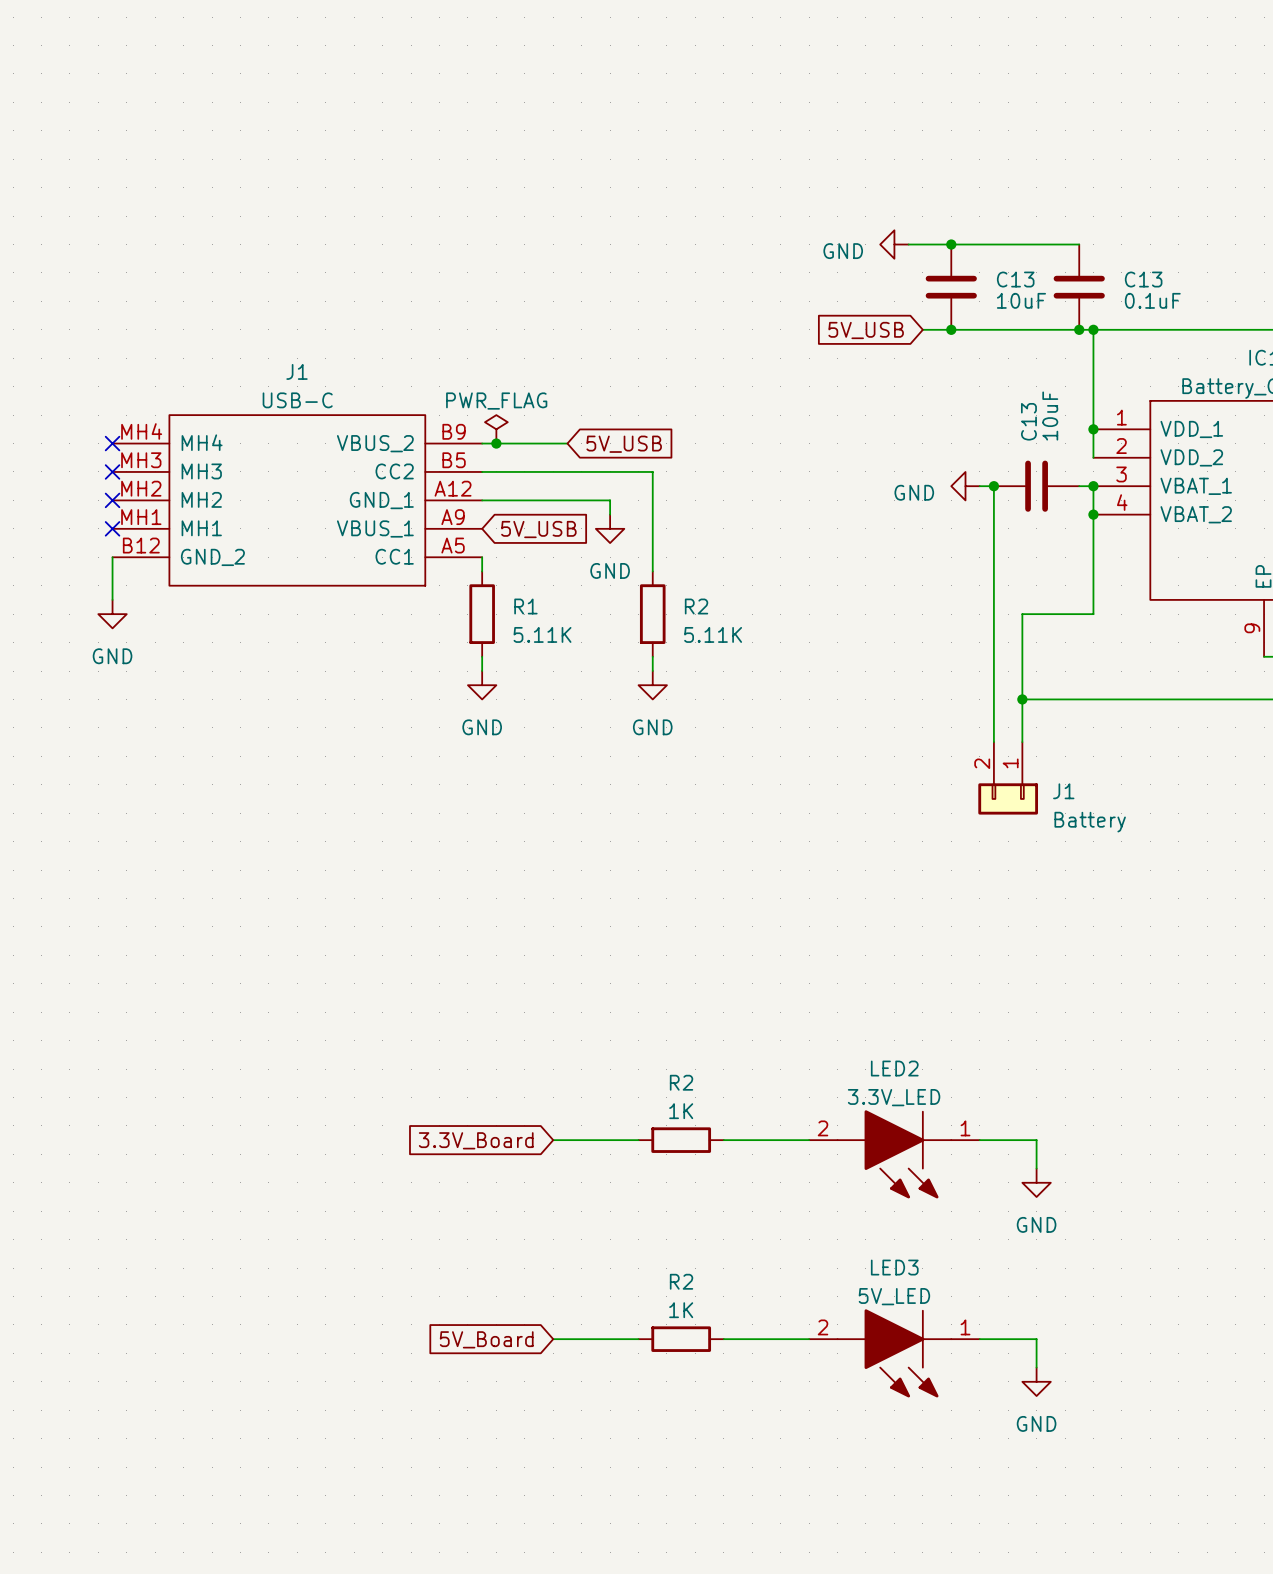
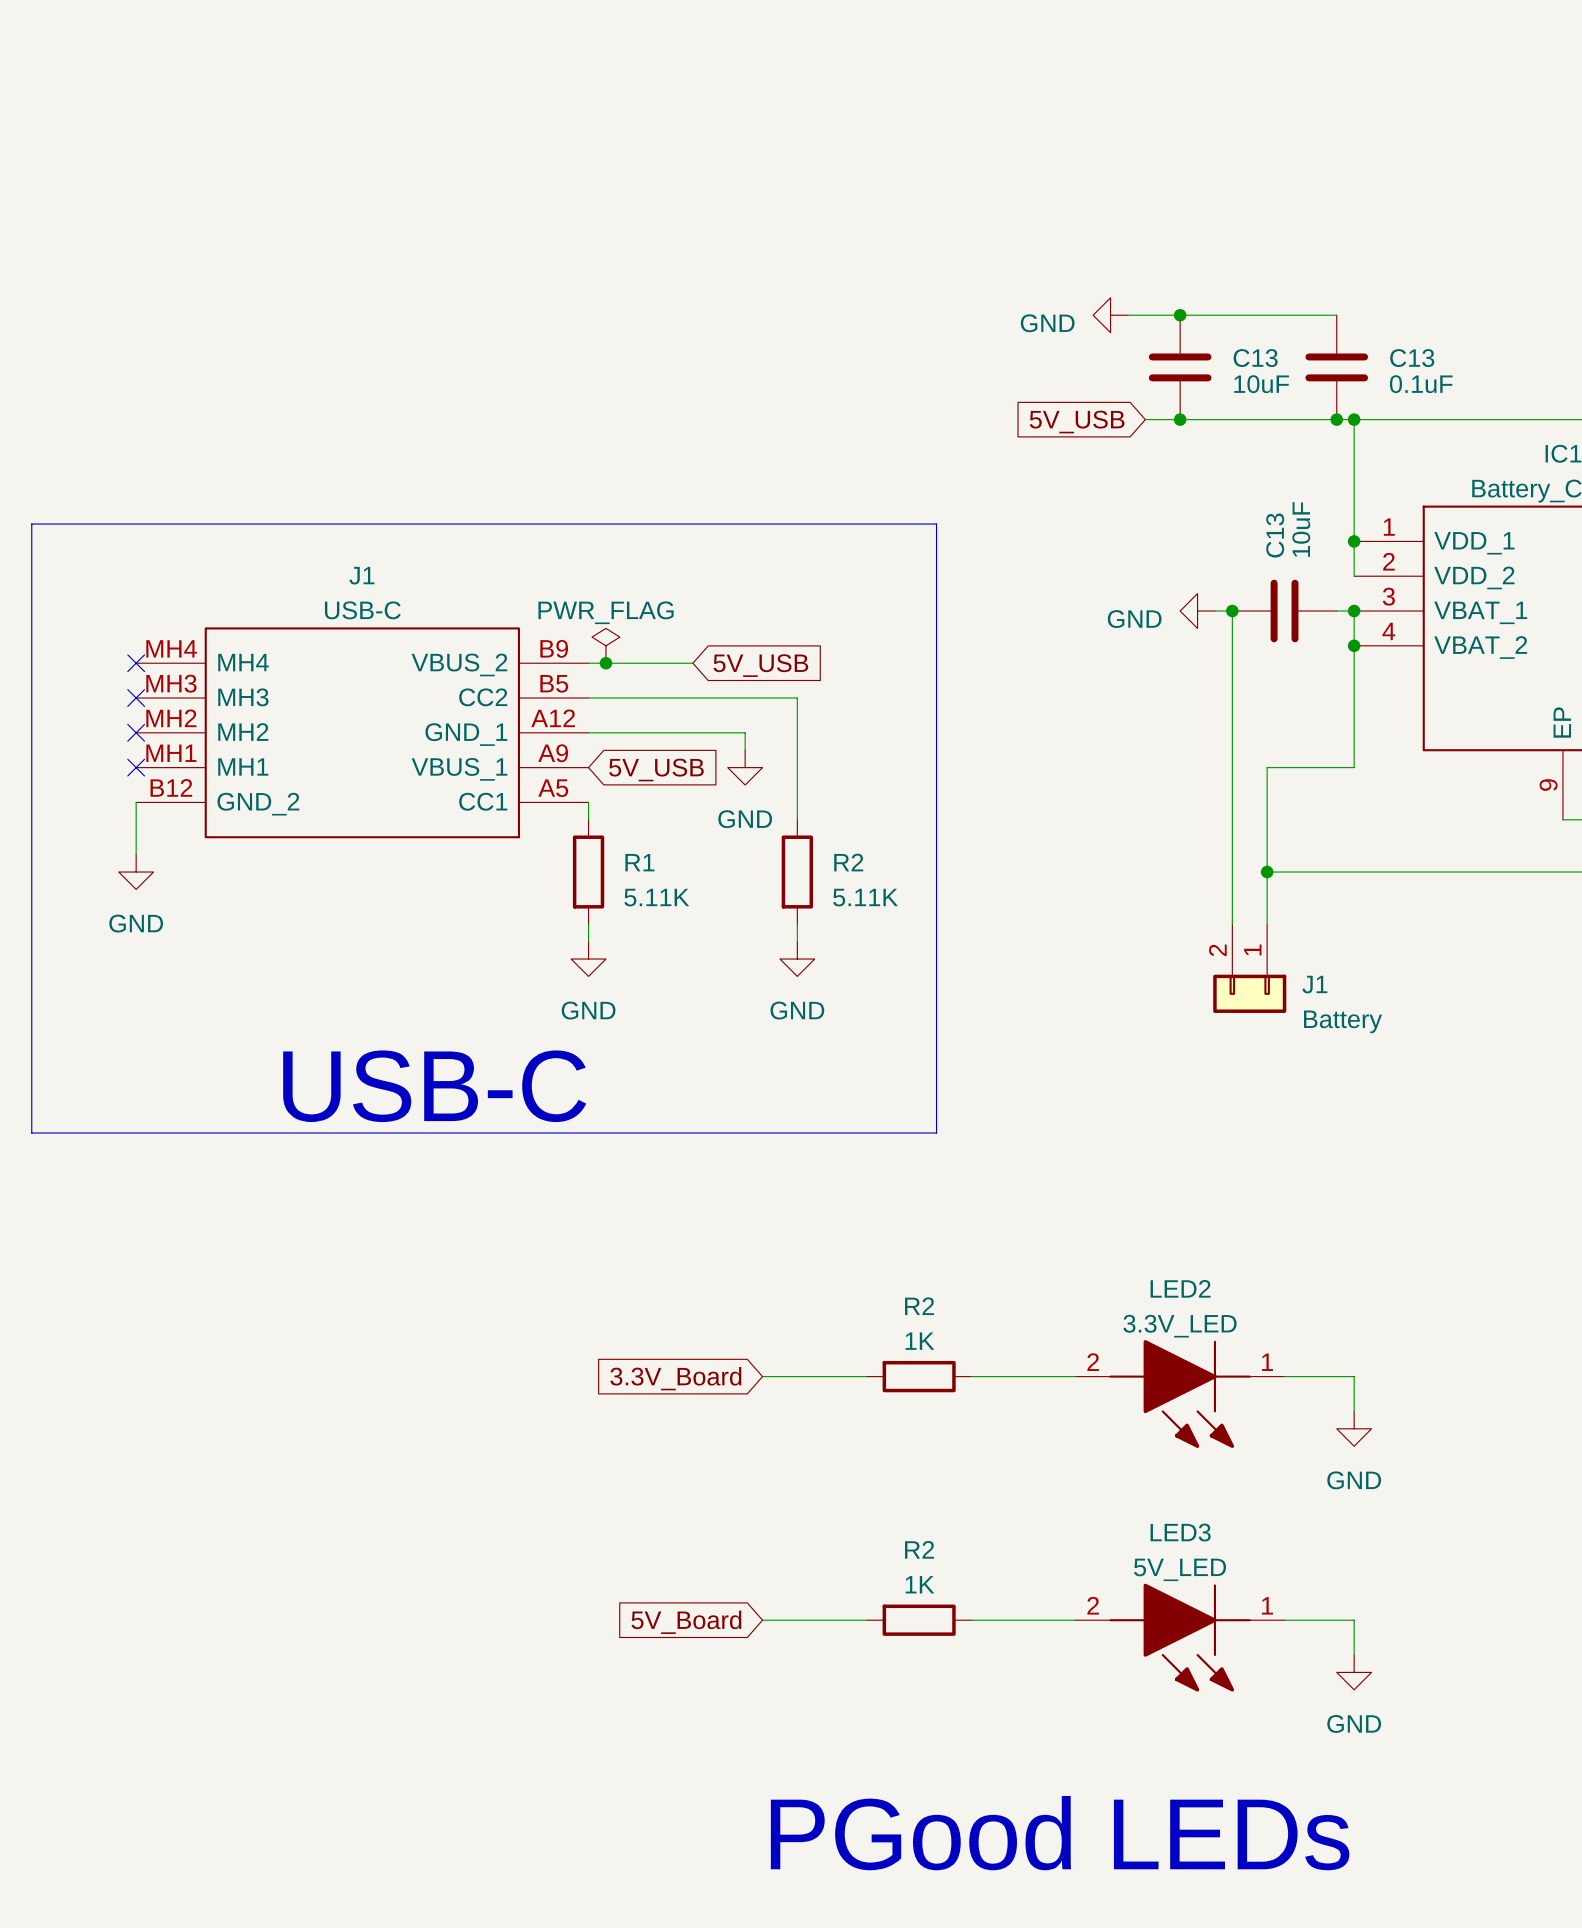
line: none -> (31, 524) (936, 524) (936, 1133) (31, 1133) (31, 524)
power symbol position: PWR_FLAG (496, 429) -> PWR_FLAG (605, 645)
no-connect mark: (112, 443) -> none
wire: (482, 443) (567, 443) -> (588, 663) (692, 663)
junction: (496, 443) -> none
global label: 5V_USB (624, 444) -> none
no-connect mark: (112, 471) -> none
wire: (482, 471) (652, 471) (652, 571) -> (588, 698) (797, 698) (797, 819)
no-connect mark: (112, 500) -> none
J1 position: (297, 500) -> (362, 732)
wire: (482, 500) (610, 500) (610, 514) -> (588, 732) (745, 732) (745, 750)
no-connect mark position: (112, 528) -> (136, 663)
junction: none -> (605, 663)
power symbol: GND (610, 528) -> none
global label position: 5V_USB (538, 529) -> 5V_USB (760, 665)
no-connect mark: none -> (136, 698)
wire: (112, 557) (112, 599) -> (136, 802) (136, 854)
wire: (482, 557) (482, 571) -> (588, 802) (588, 819)
no-connect mark: none -> (136, 732)
no-connect mark: none -> (136, 767)
power symbol position: GND (112, 614) -> GND (136, 872)
R1 position: (482, 614) -> (588, 872)
global label: none -> 5V_USB (656, 770)
power symbol: none -> GND (745, 767)
R2 position: (652, 614) -> (797, 872)
wire: (482, 656) (482, 671) -> (588, 924) (588, 941)
wire: (652, 656) (652, 671) -> (797, 924) (797, 941)
power symbol: GND (482, 685) -> none
power symbol: GND (652, 685) -> none
power symbol: none -> GND (588, 959)
power symbol: none -> GND (797, 959)
text: none -> USB-C (434, 1086)
global label position: 3.3V_Board (476, 1140) -> 3.3V_Board (675, 1378)
wire: (553, 1140) (638, 1140) -> (762, 1376) (866, 1376)
R2 position: (681, 1140) -> (919, 1376)
wire: (723, 1140) (809, 1140) -> (971, 1376) (1075, 1376)
wire: (979, 1140) (1036, 1140) (1036, 1168) -> (1284, 1376) (1354, 1376) (1354, 1411)
LED2 position: (894, 1154) -> (1180, 1394)
power symbol position: GND (1036, 1182) -> GND (1354, 1428)
global label position: 5V_Board (486, 1339) -> 5V_Board (686, 1622)
wire: (553, 1339) (638, 1339) -> (762, 1620) (866, 1620)
R2 position: (681, 1339) -> (919, 1620)
wire: (723, 1339) (809, 1339) -> (971, 1620) (1075, 1620)
wire: (979, 1339) (1036, 1339) (1036, 1367) -> (1284, 1620) (1354, 1620) (1354, 1655)
LED3 position: (894, 1353) -> (1180, 1637)
power symbol position: GND (1036, 1381) -> GND (1354, 1672)
text: none -> PGood LEDs (1060, 1833)

